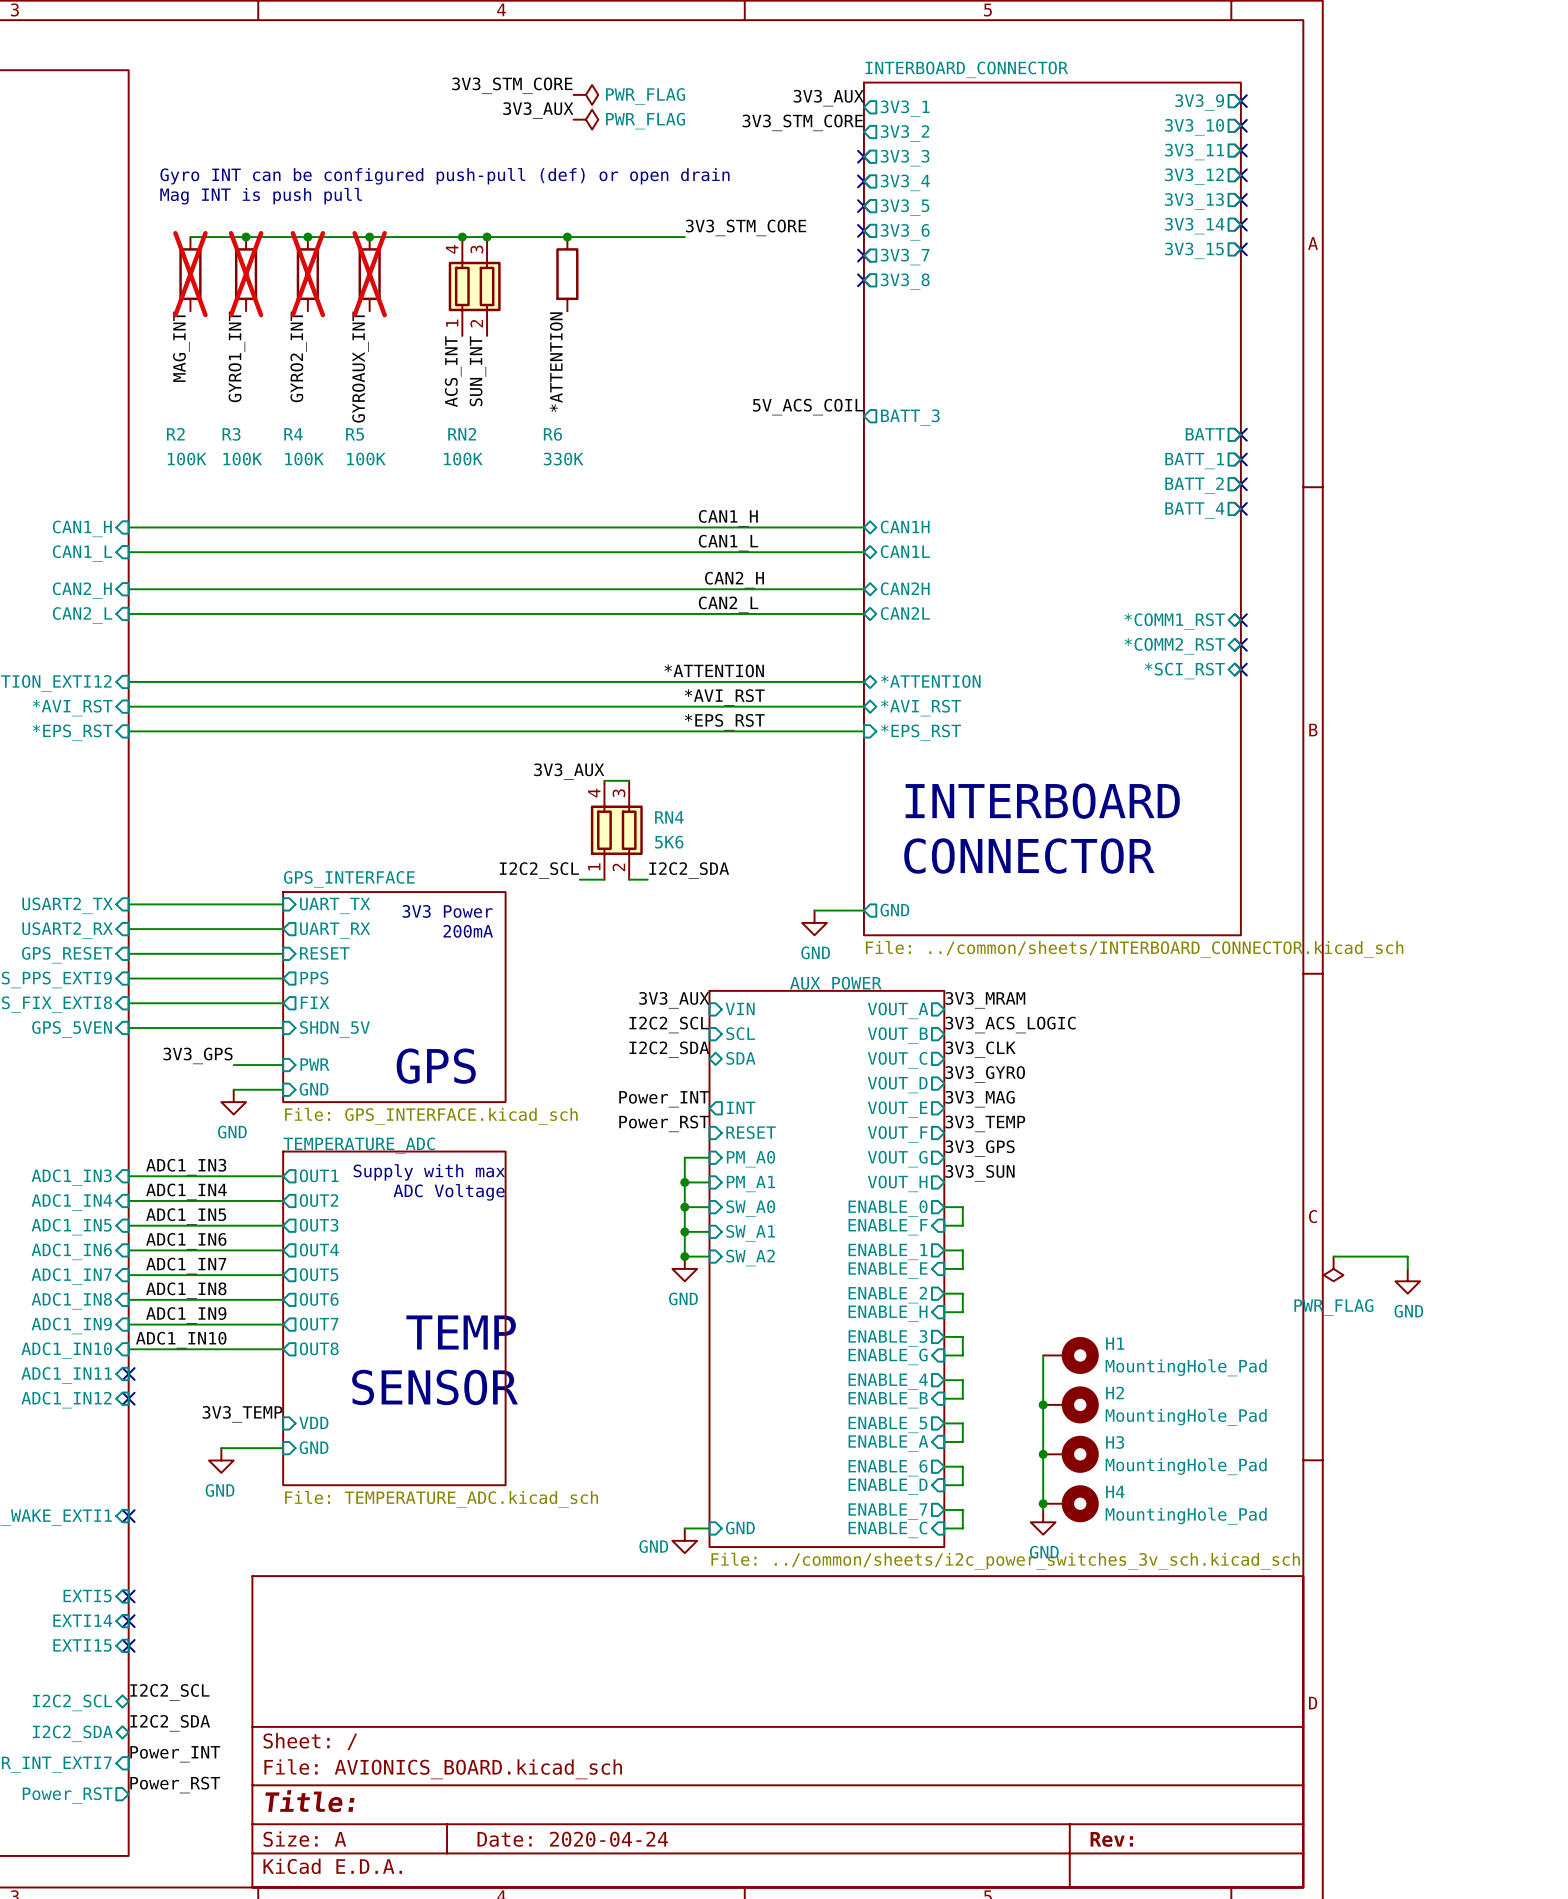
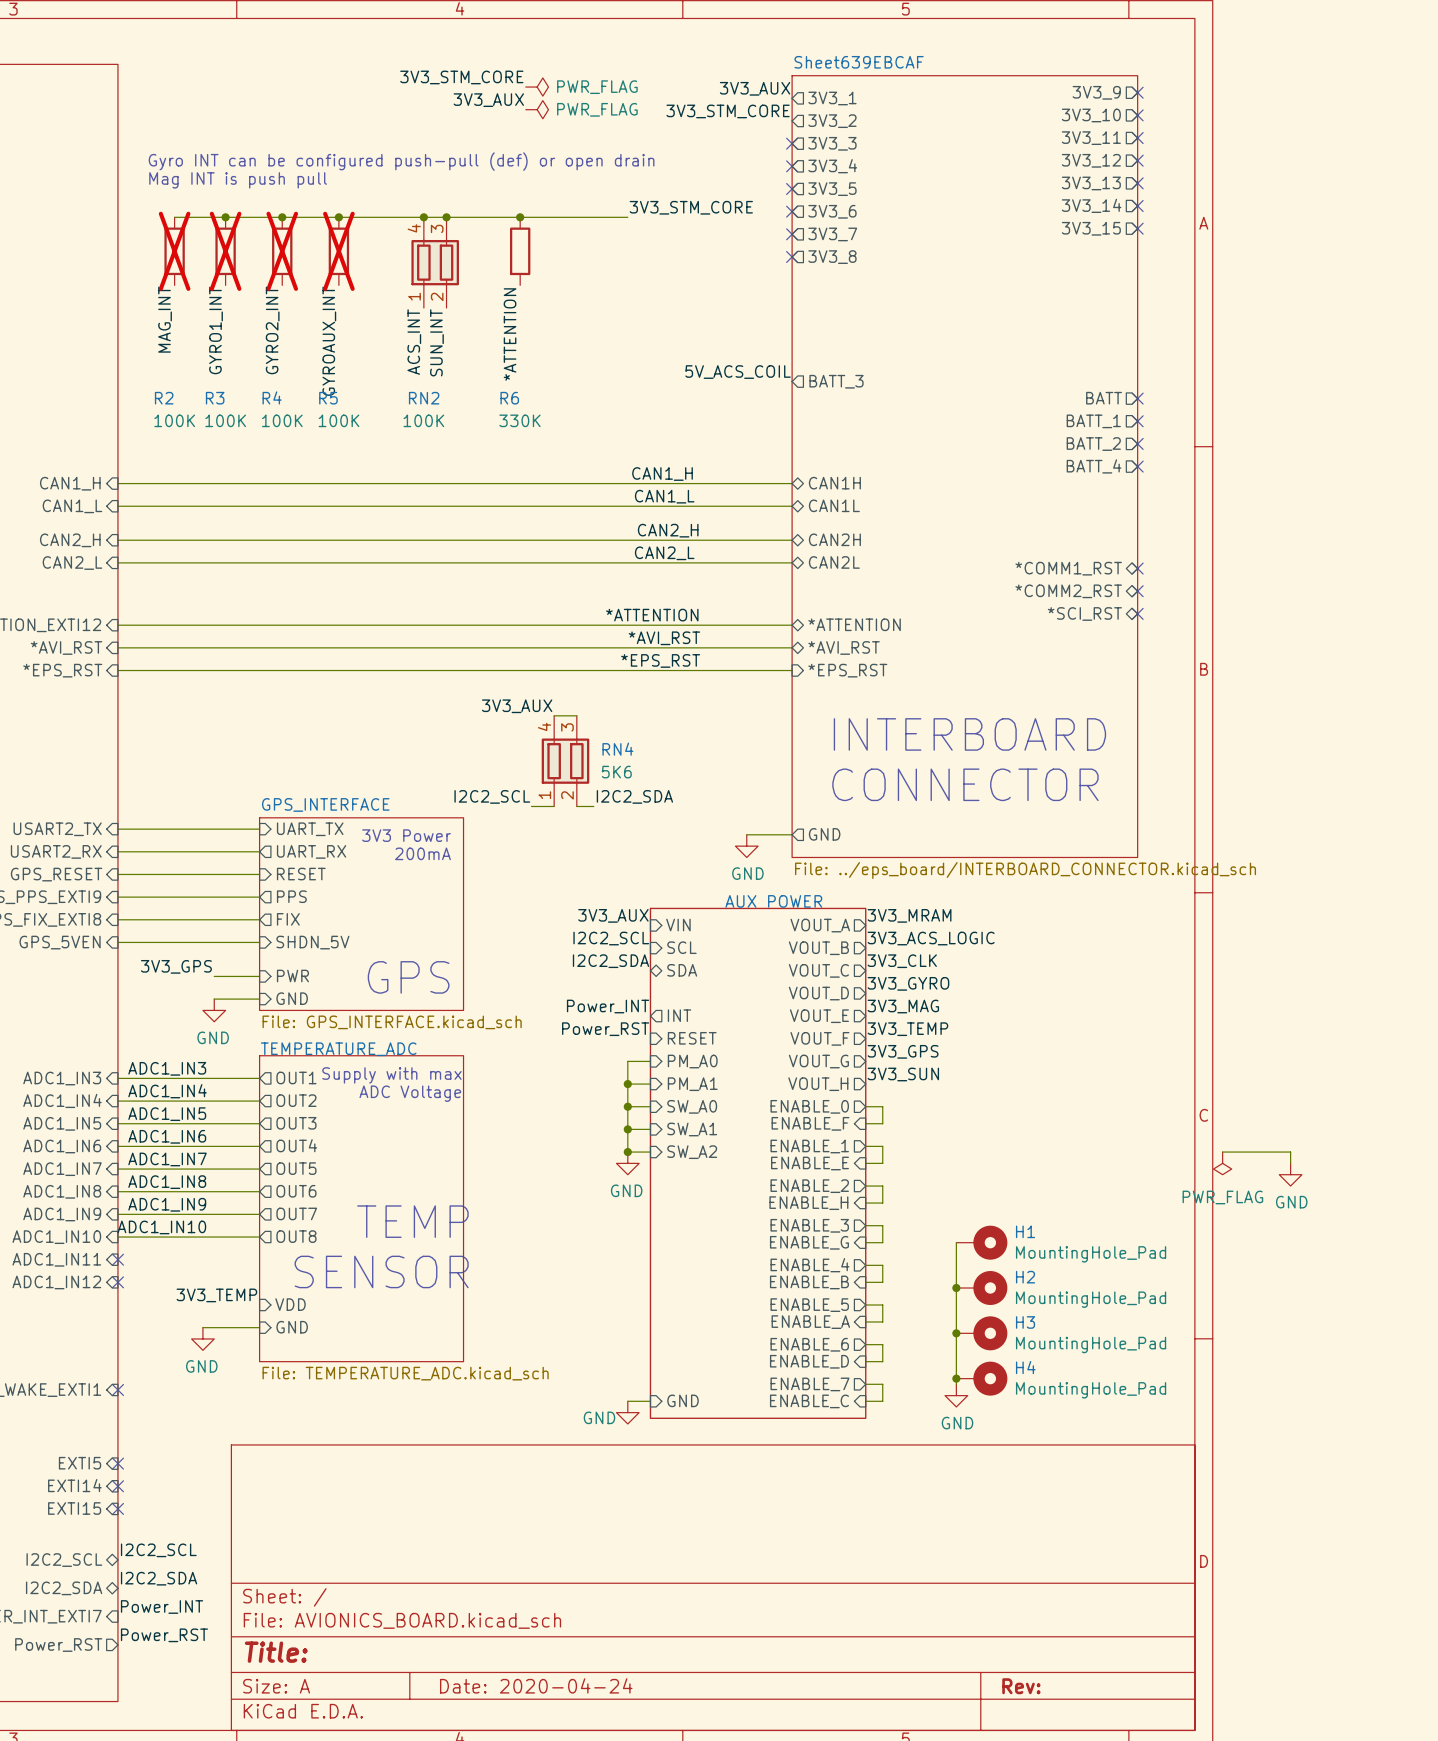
sheet INTERBOARD_CONNECTOR name: INTERBOARD_CONNECTOR (966, 69) -> Sheet639EBCAF (859, 62)
sheet INTERBOARD_CONNECTOR value: File: ../common/sheets/INTERBOARD_CONNECTOR.kicad_sch (1134, 949) -> File: ../eps_board/INTERBOARD_CONNECTOR.kicad_sch (1025, 870)
sheet AUX POWER value: File: ../common/sheets/i2c_power_switches_3v_sch.kicad_sch (1005, 1561) -> none

